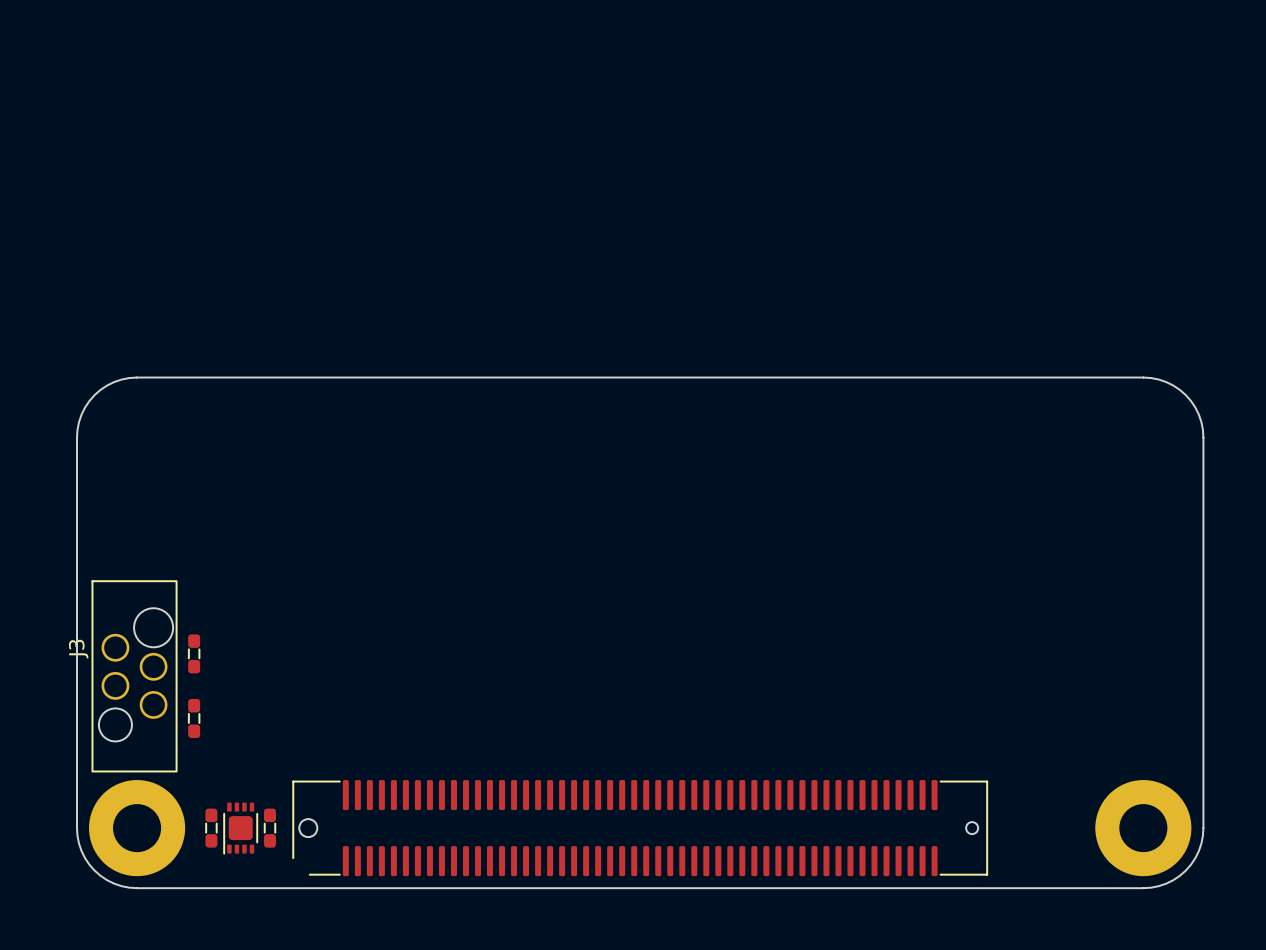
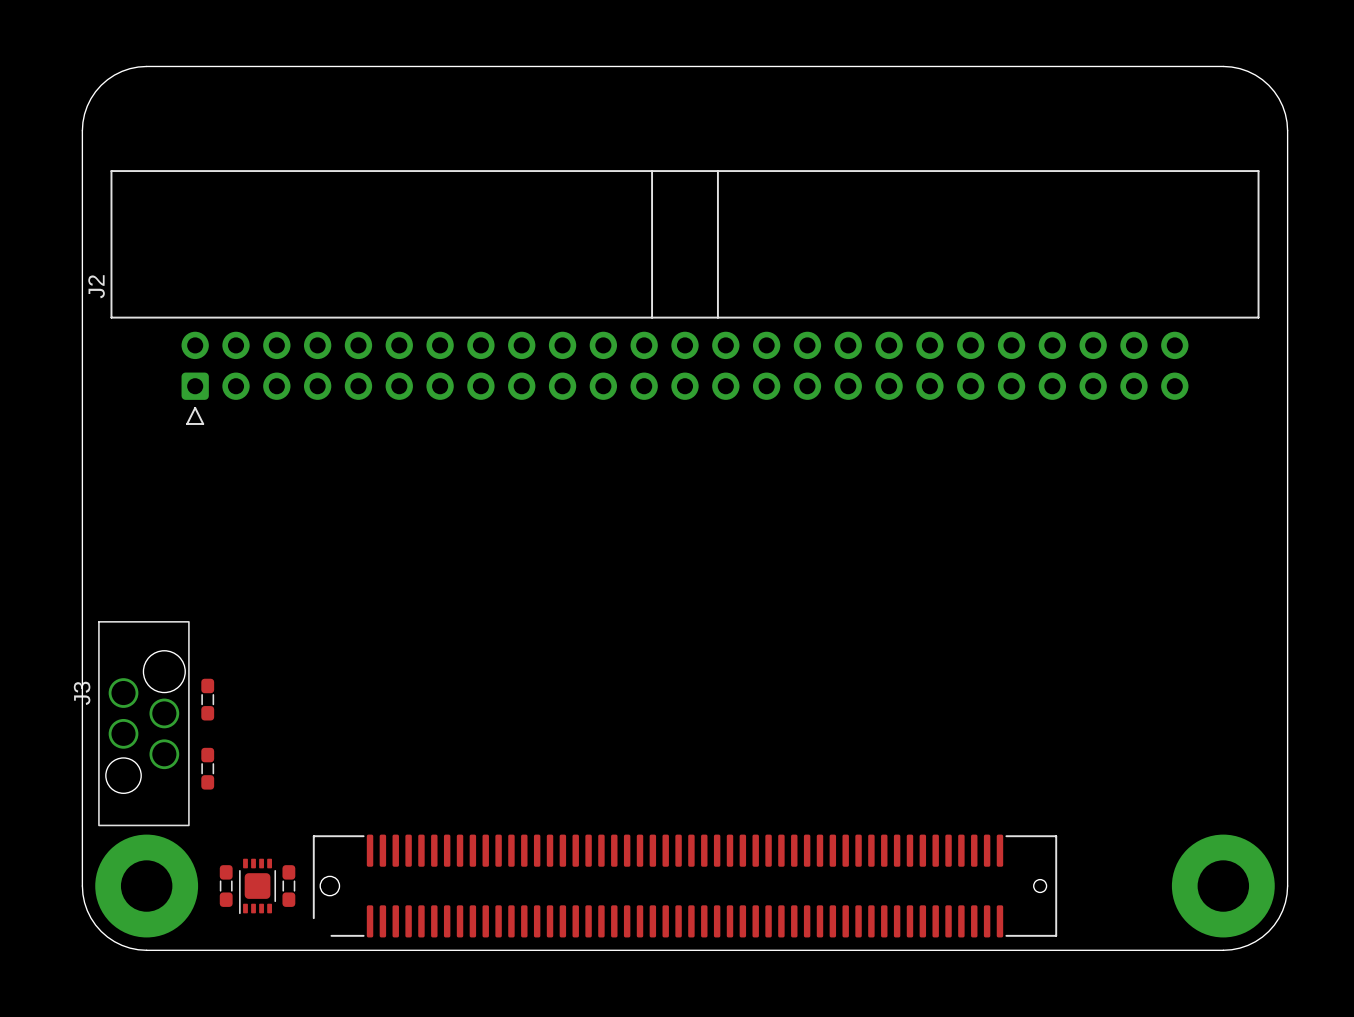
J2: none -> (684, 297)
board edge: (77, 437) (81, 414) (94, 395) (114, 382) (137, 377) (1143, 377) (1166, 382) (1185, 395) (1198, 414) (1203, 437) -> (82, 468) (82, 122) (90, 98) (101, 85) (122, 71) (146, 66) (1223, 66) (1247, 71) (1262, 79) (1274, 91) (1282, 106) (1287, 122) (1287, 468)

